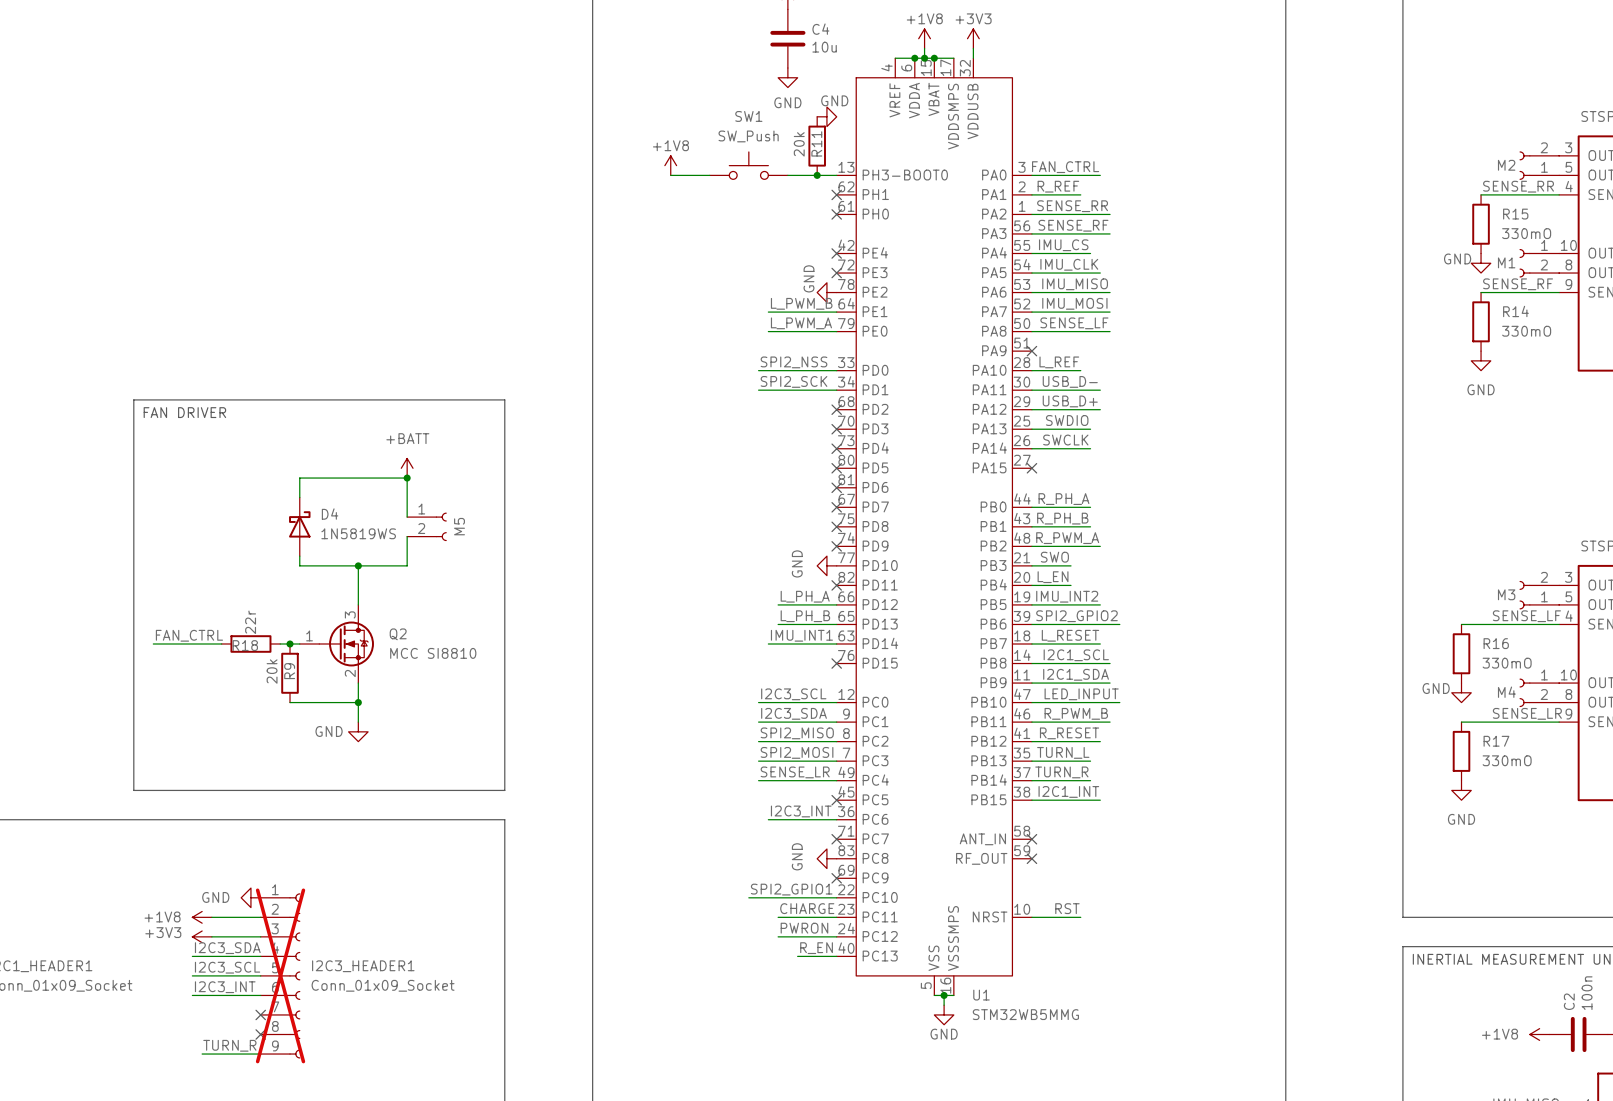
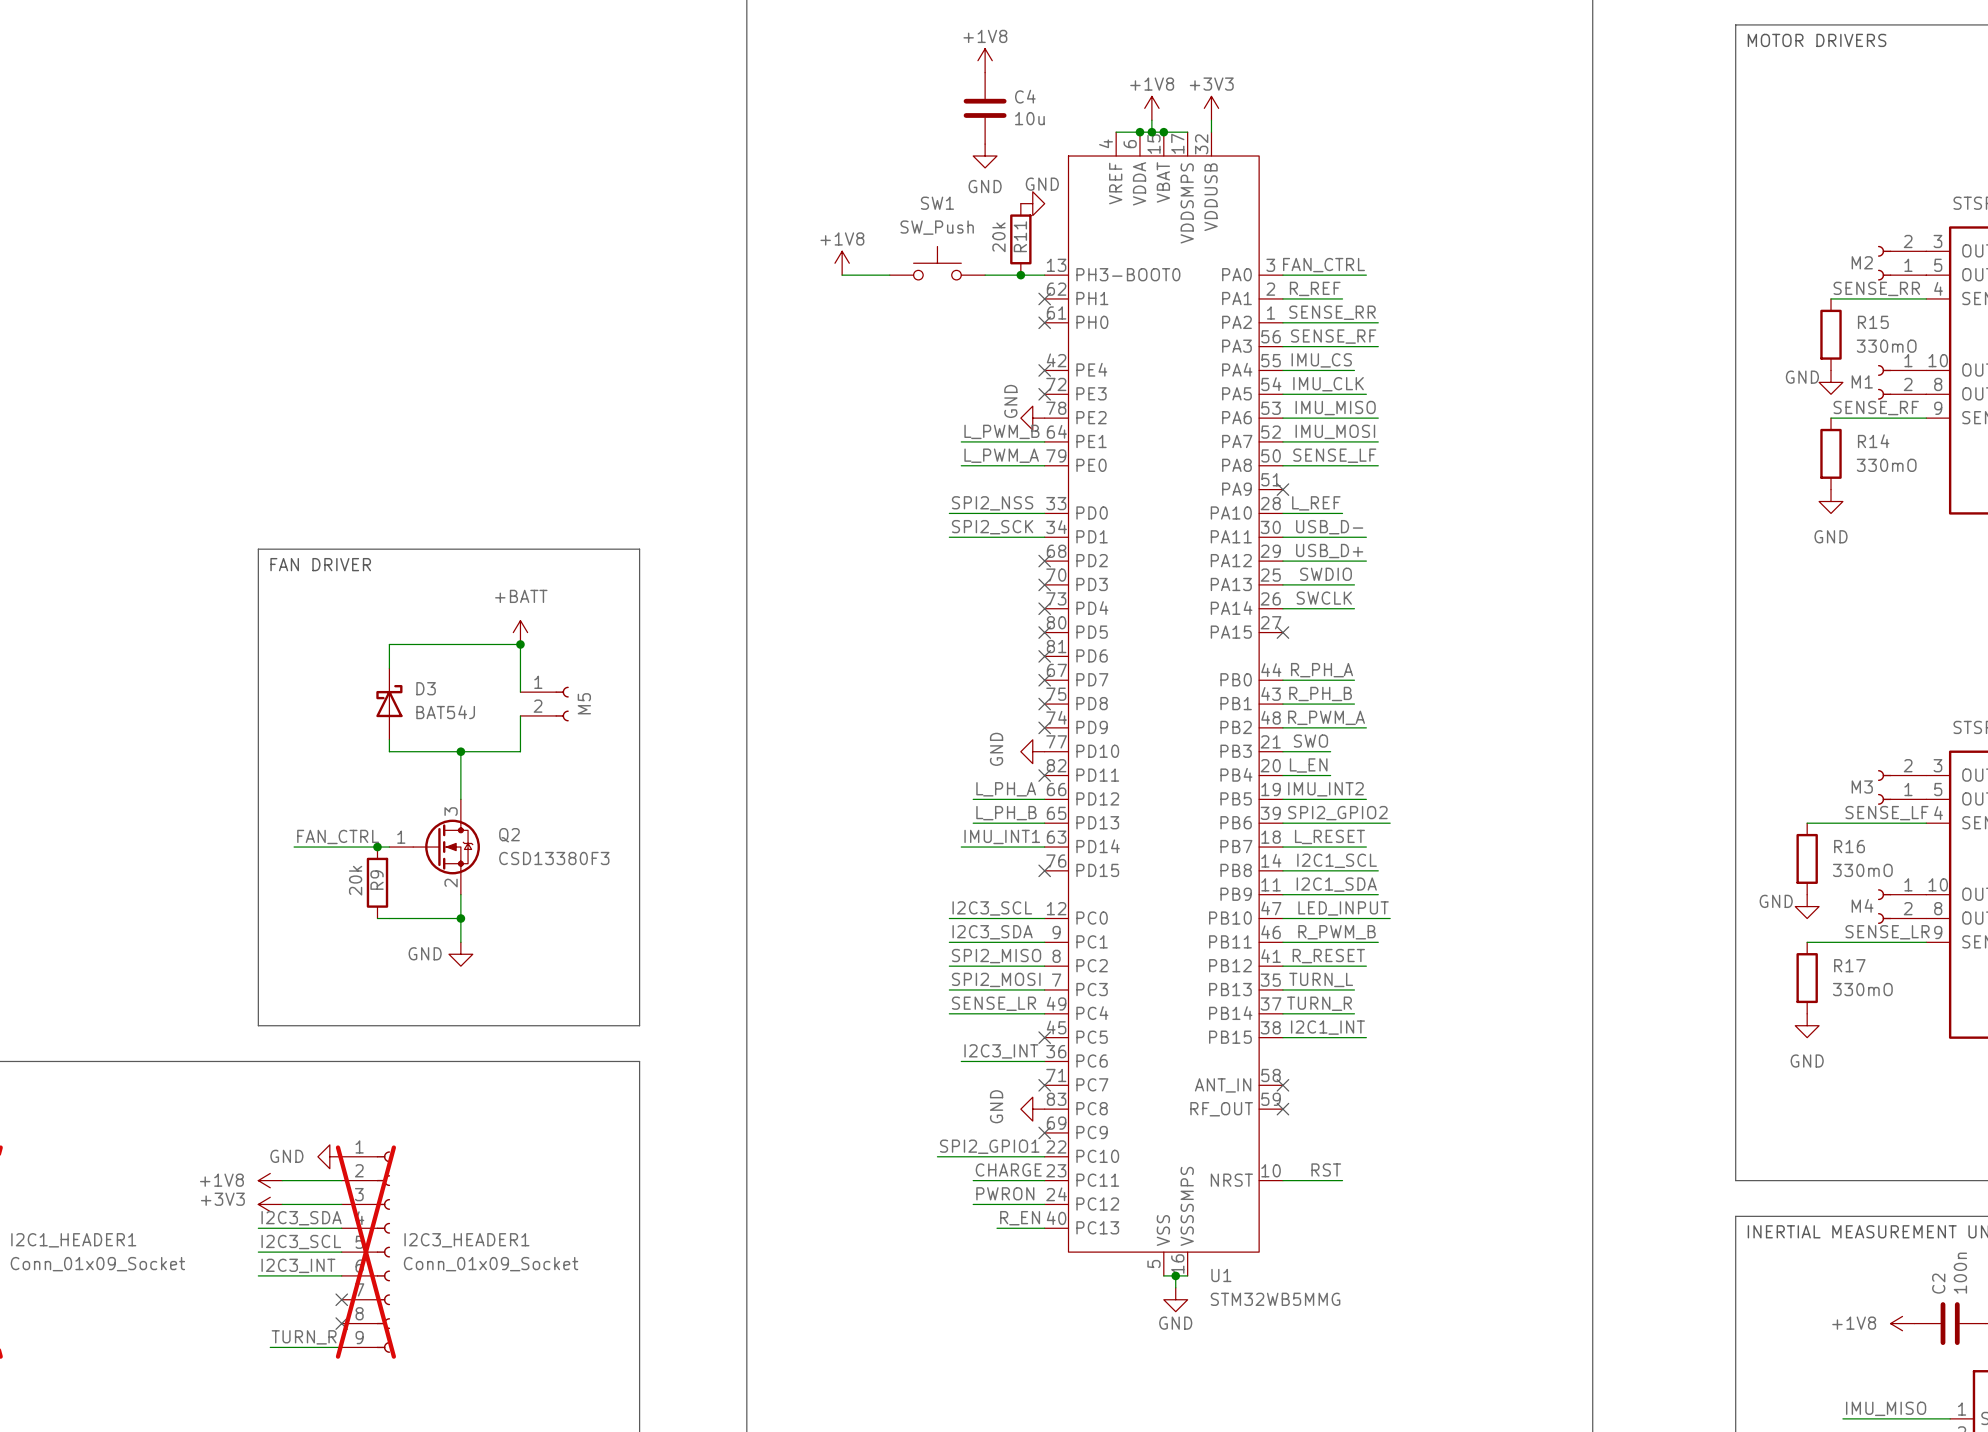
line: (192, 399) (133, 399) (133, 790) (192, 790) -> (258, 549) (258, 1025)
text position: FAN DRIVER (184, 412) -> FAN DRIVER (320, 564)
D4 name: D4 (330, 514) -> D3 (426, 688)
D4 value: 1N5819WS (358, 533) -> BAT54J (445, 712)
label position: FAN_CTRL (189, 635) -> FAN_CTRL (338, 836)
wire: (153, 643) (221, 643) -> (365, 847) (294, 847)
R18: 22r (250, 643) -> none
Q2 value: MCC SI8810 (433, 653) -> CSD13380F3 (554, 858)

